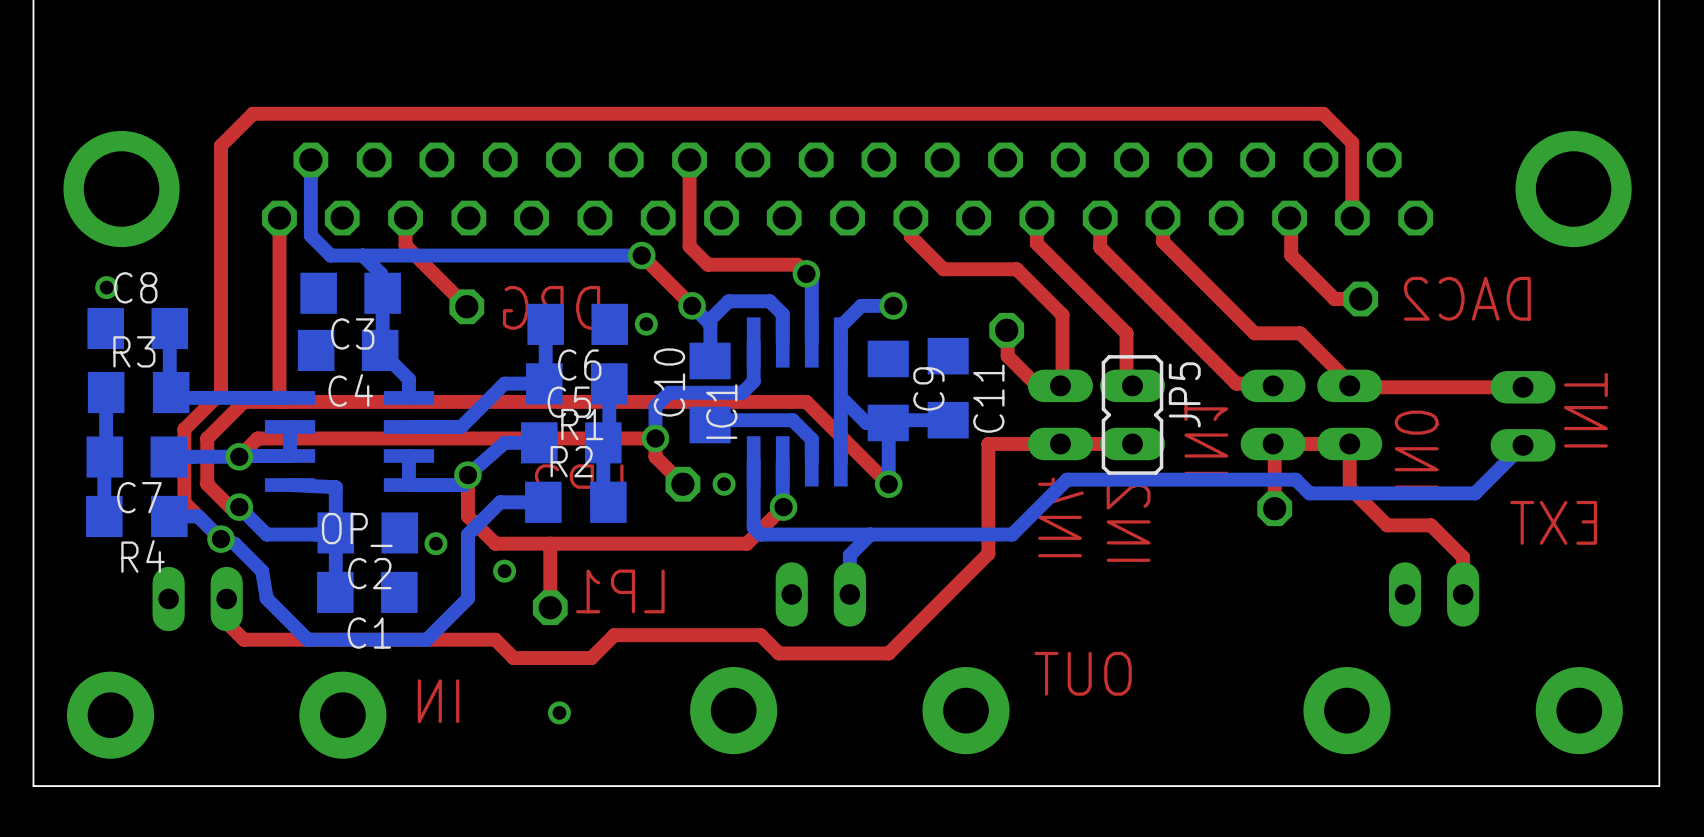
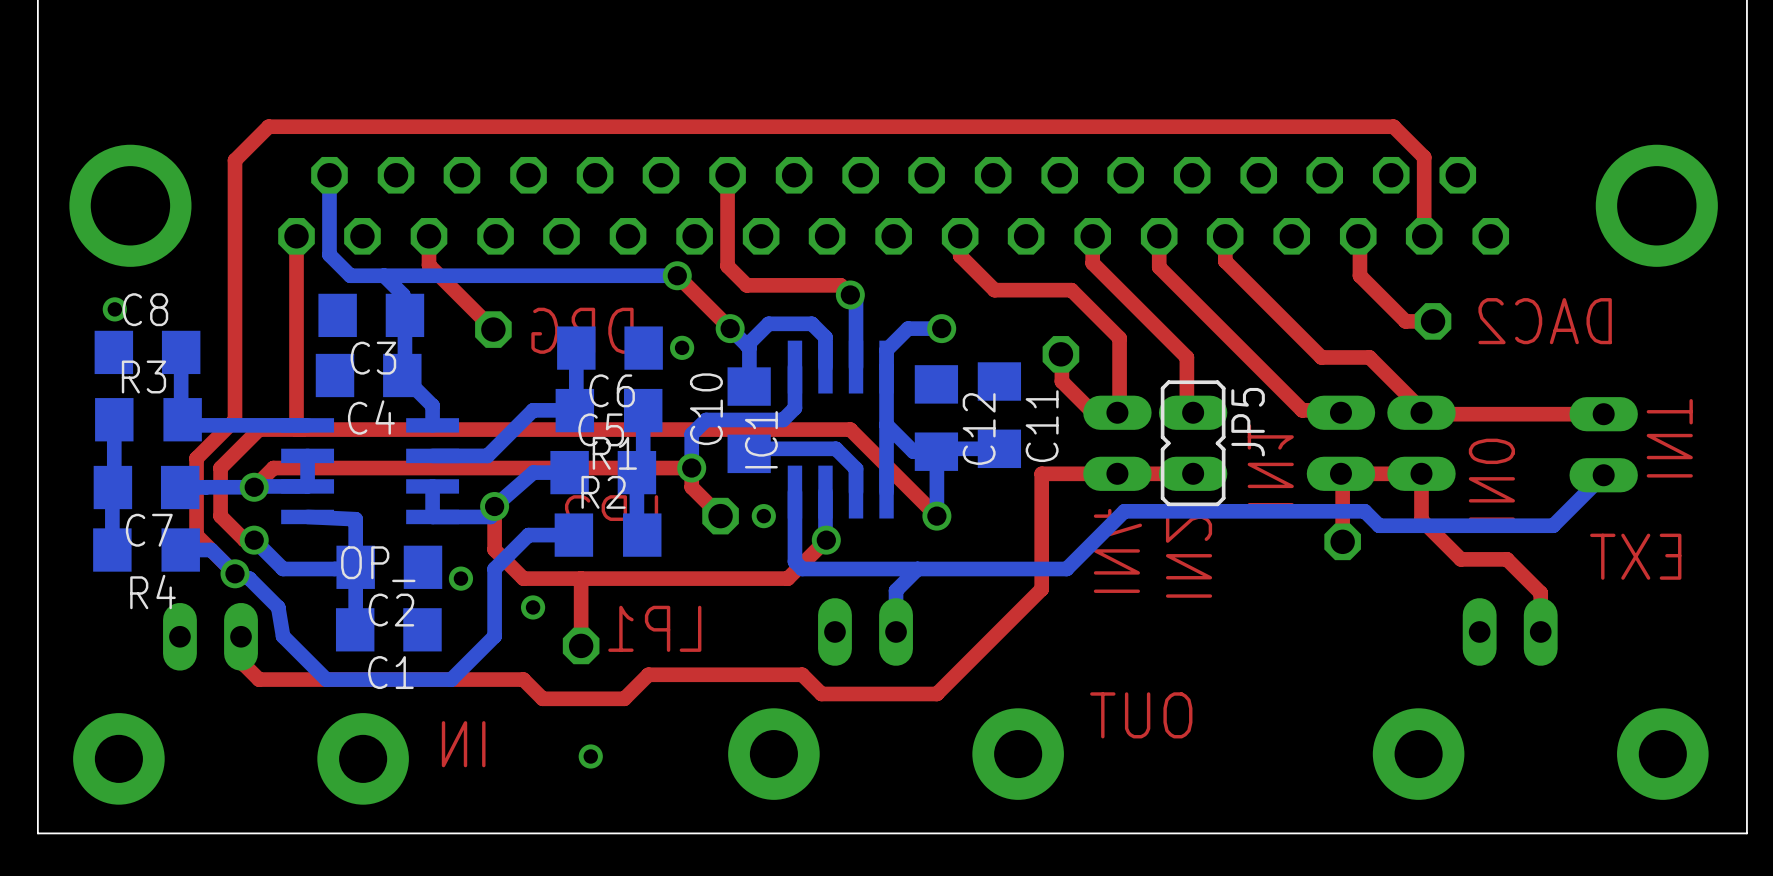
C9 name: C9 (928, 388) -> C12 (979, 429)

